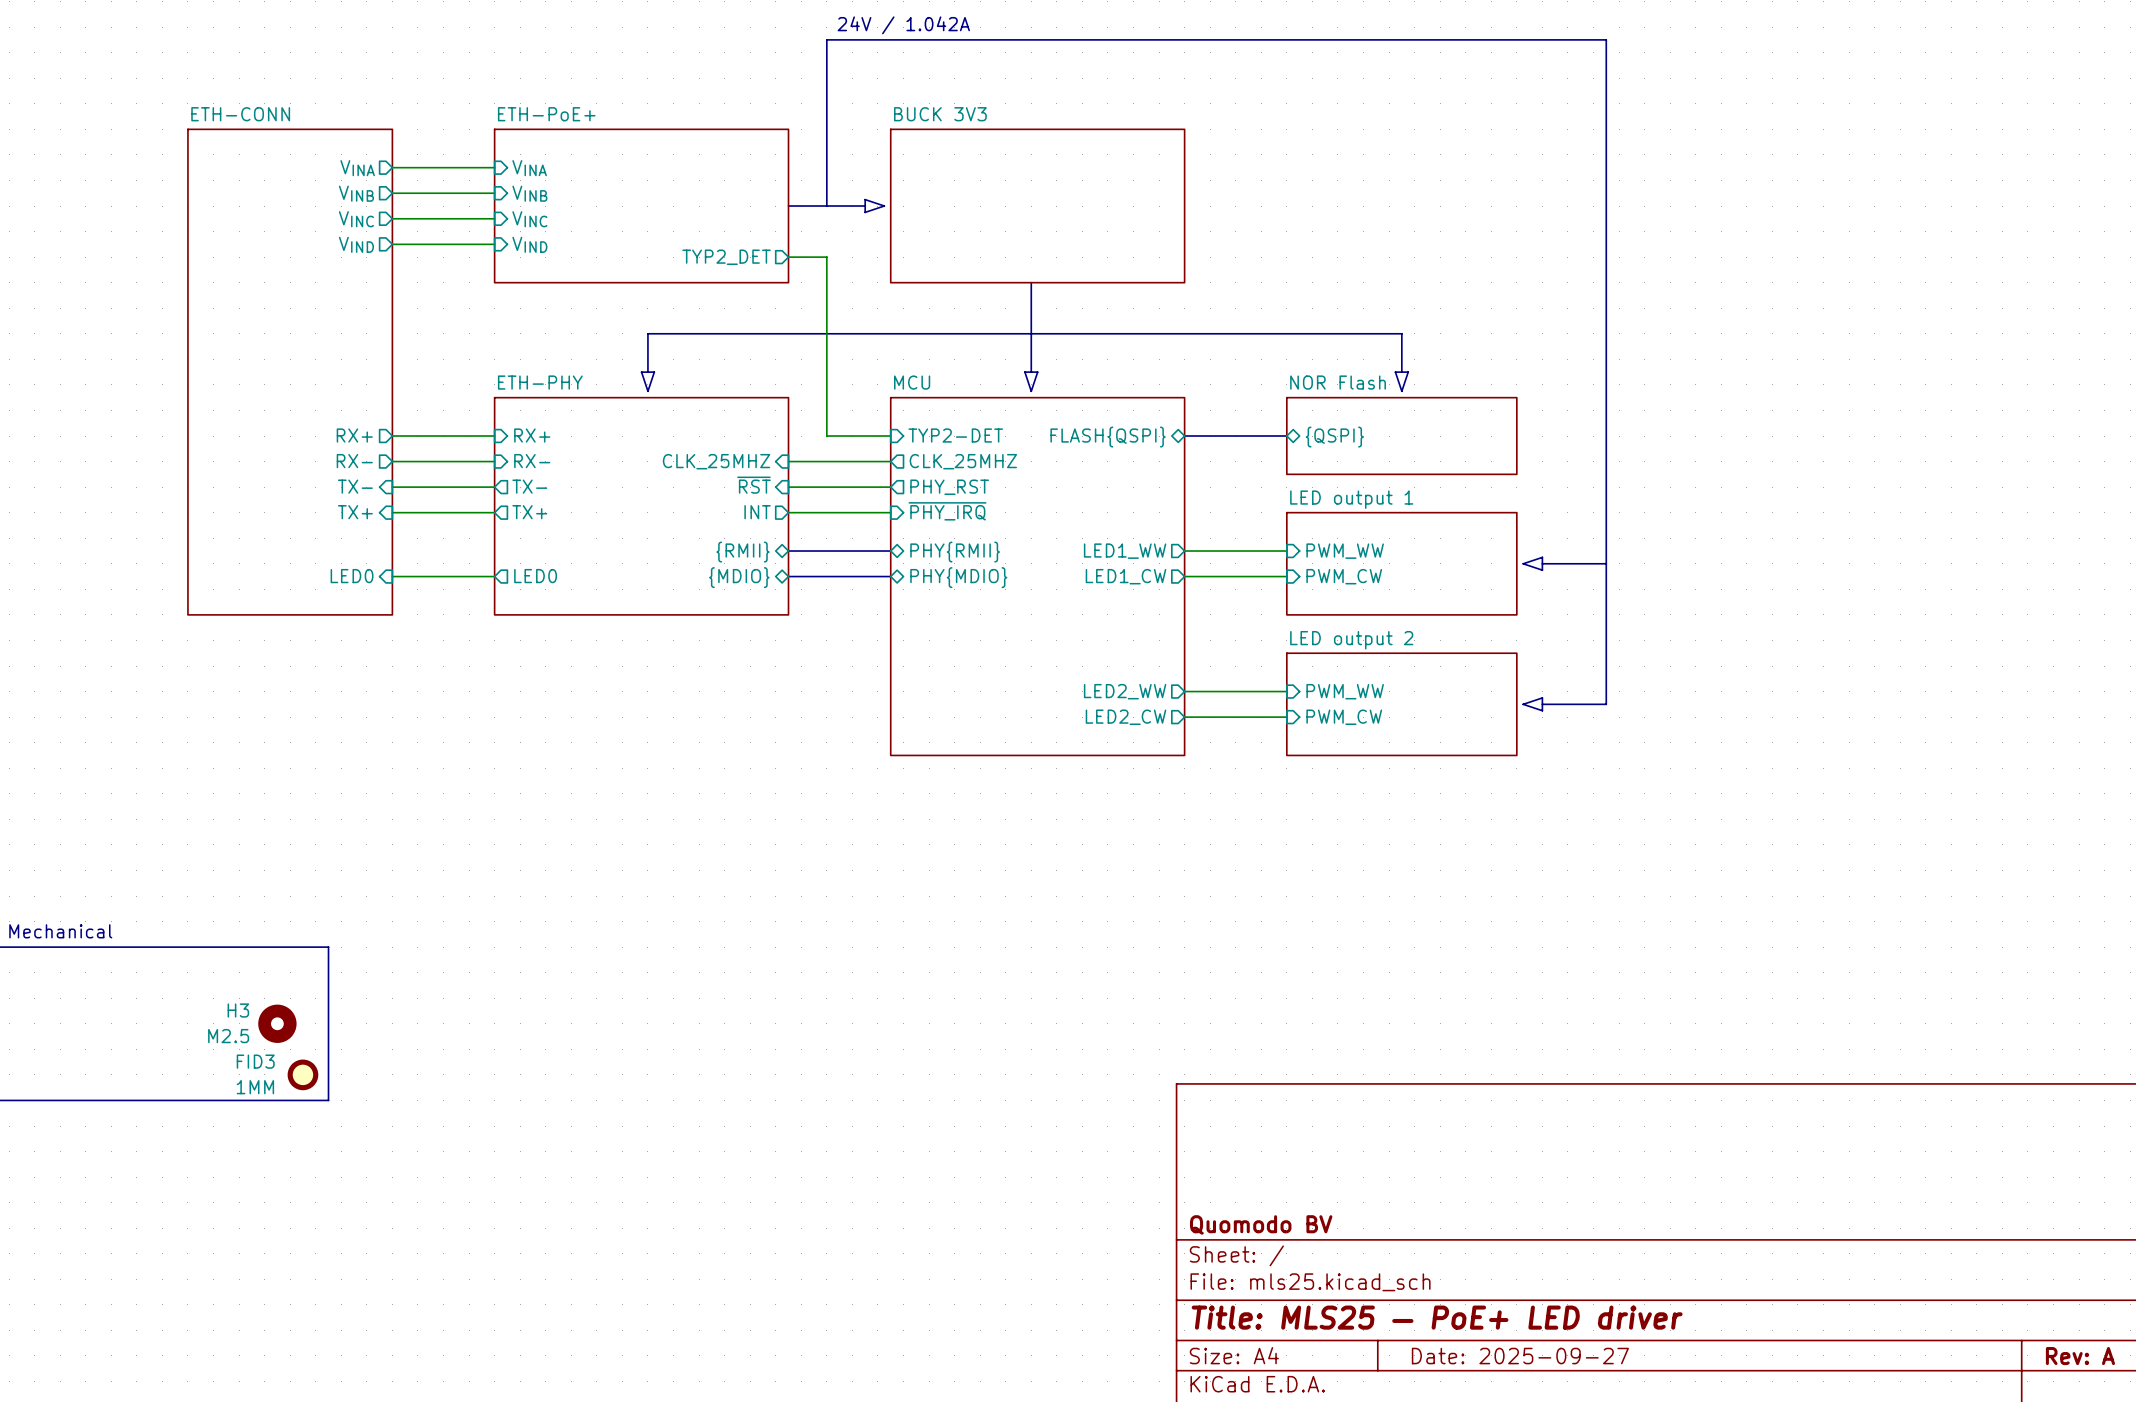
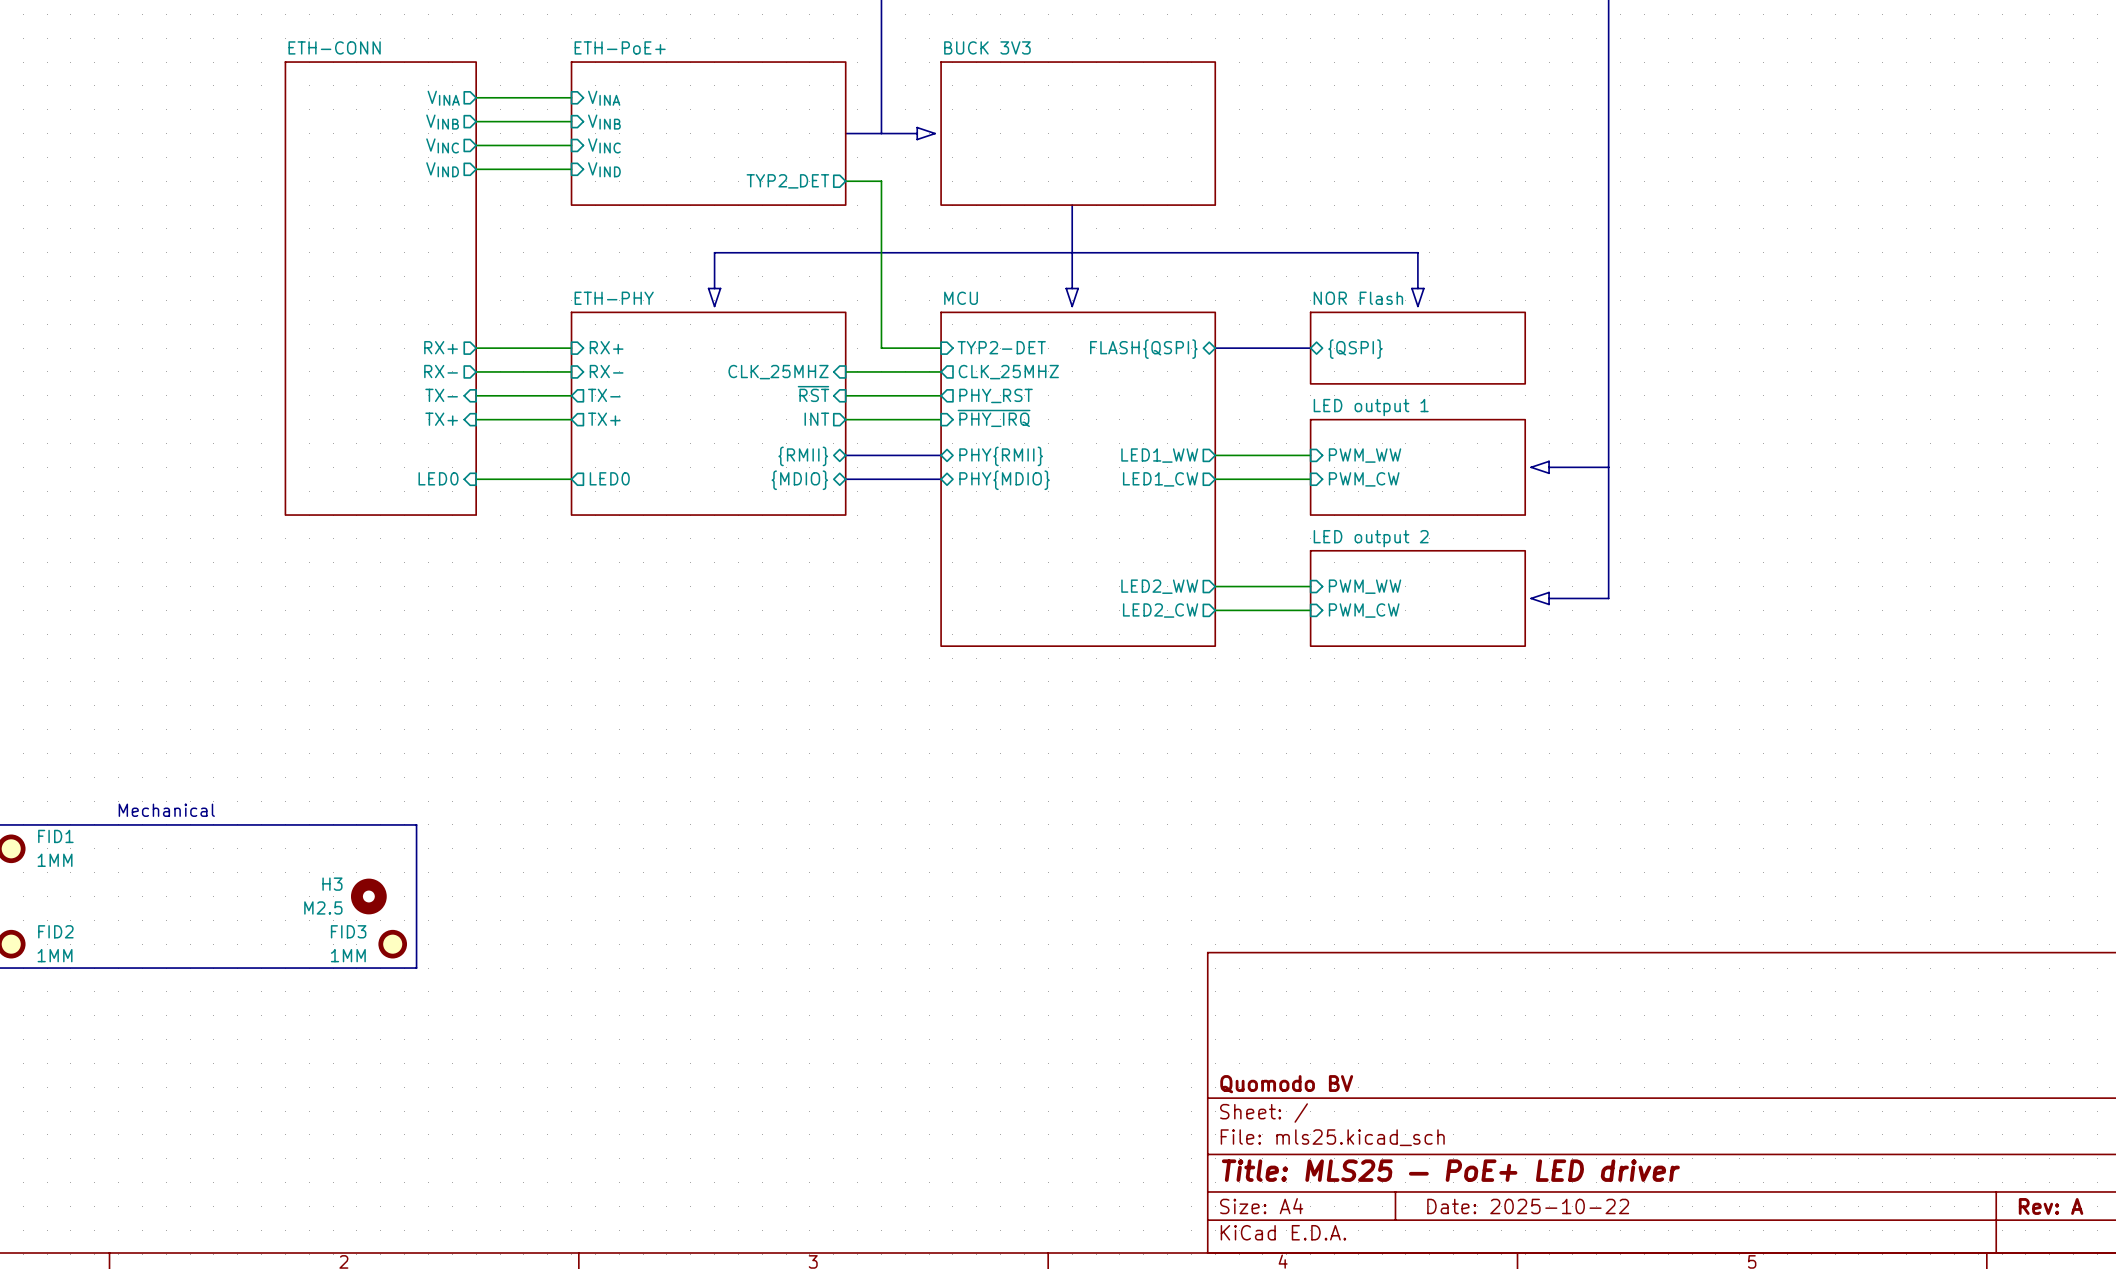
title block: Date: 2025-09-27 (1520, 1356) -> Date: 2025-10-22 (1528, 1206)

